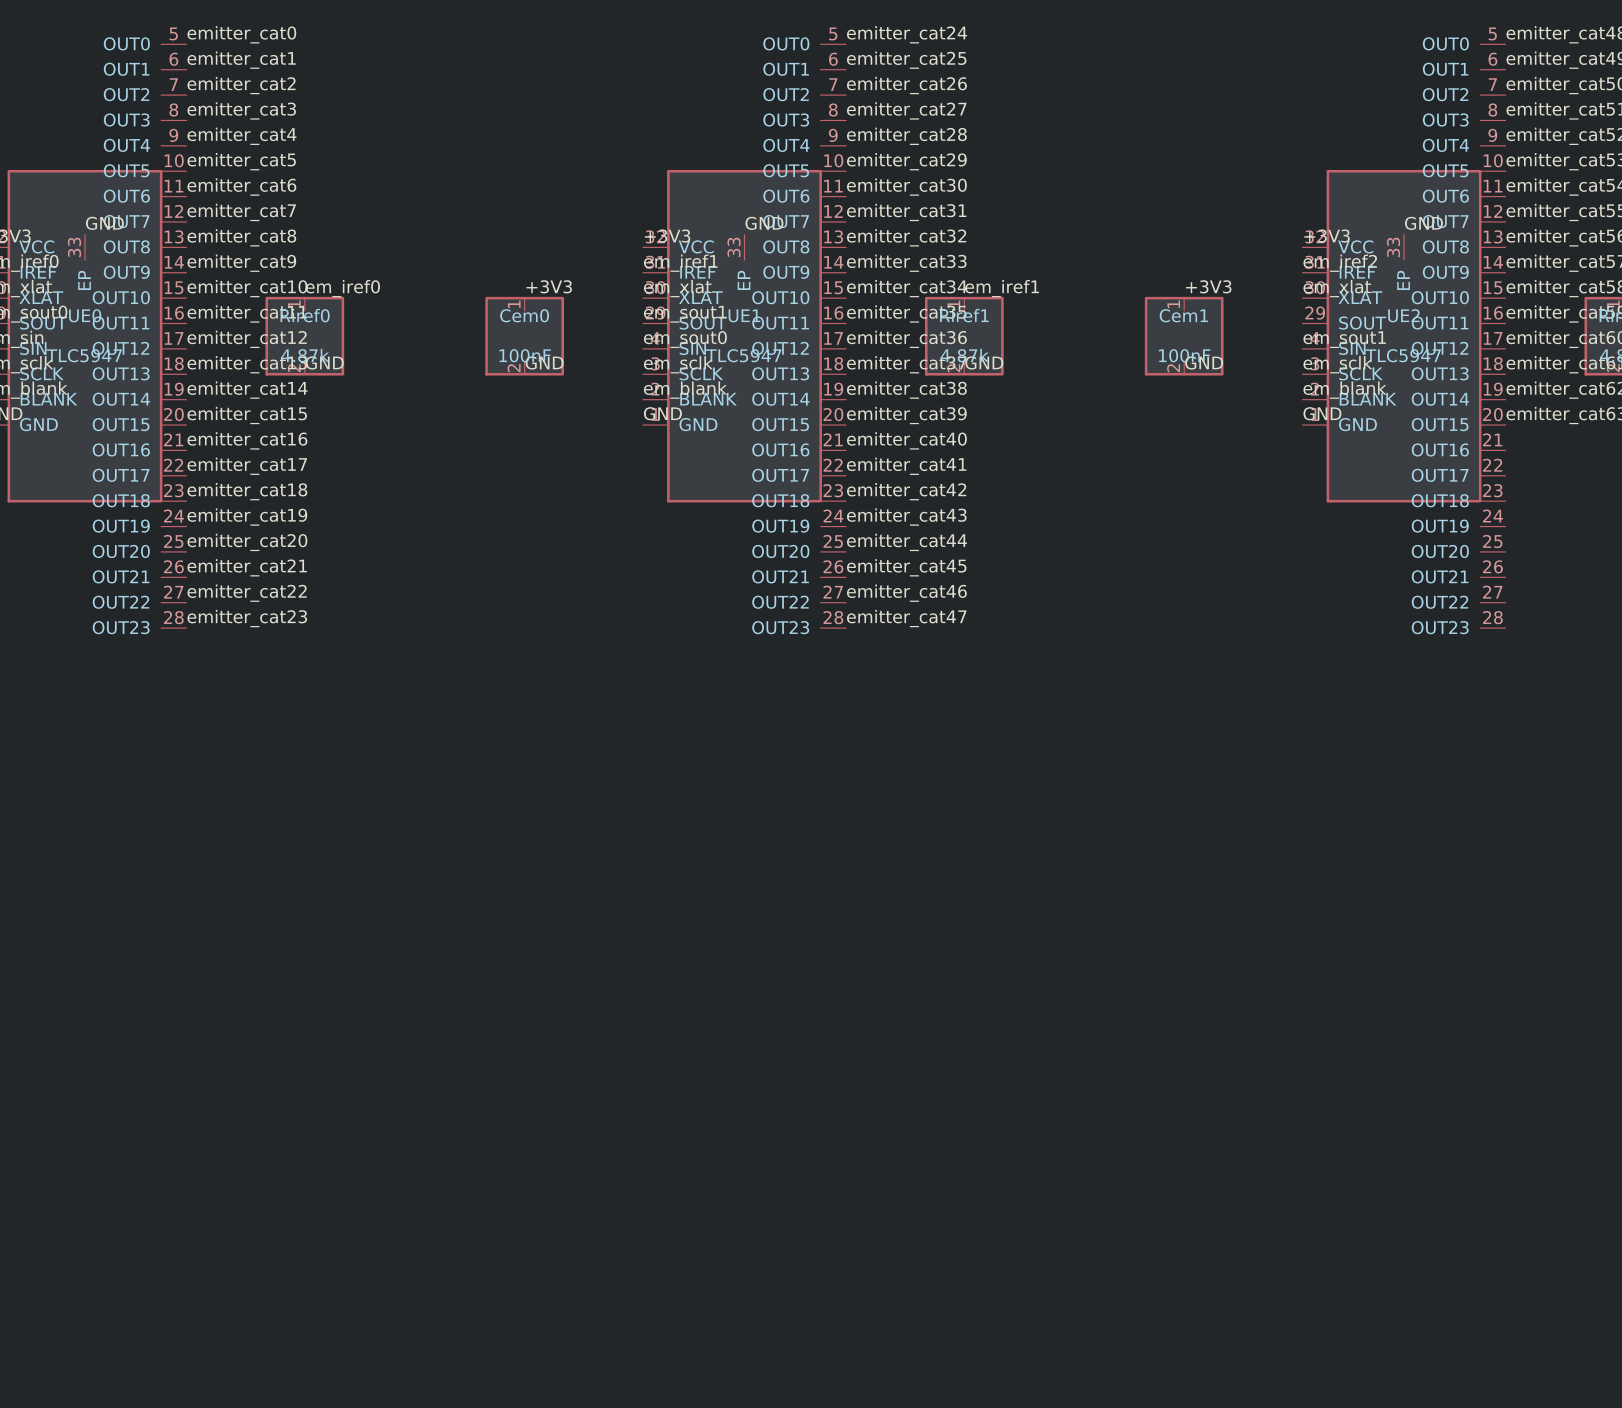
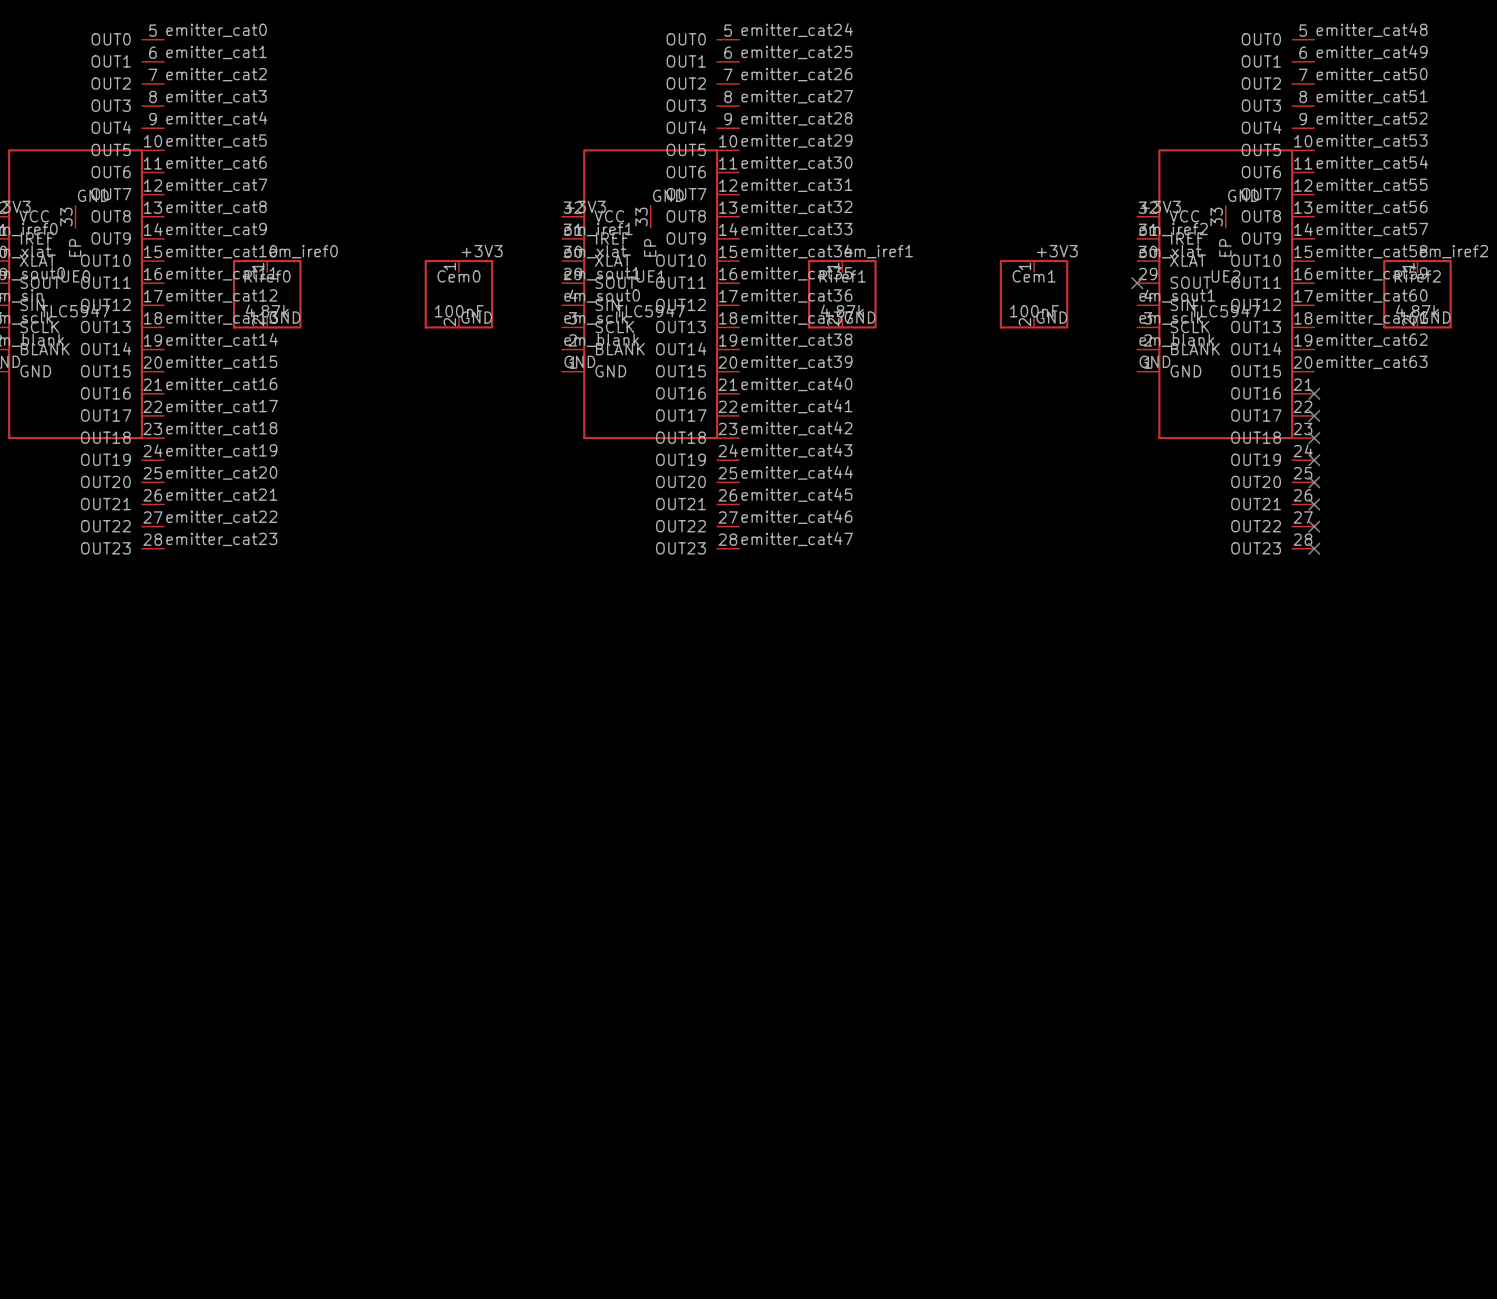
no-connect mark: none -> (1137, 283)
no-connect mark: none -> (1314, 393)
no-connect mark: none -> (1314, 415)
no-connect mark: none -> (1314, 438)
no-connect mark: none -> (1314, 460)
no-connect mark: none -> (1314, 482)
no-connect mark: none -> (1314, 504)
no-connect mark: none -> (1314, 526)
no-connect mark: none -> (1314, 548)

